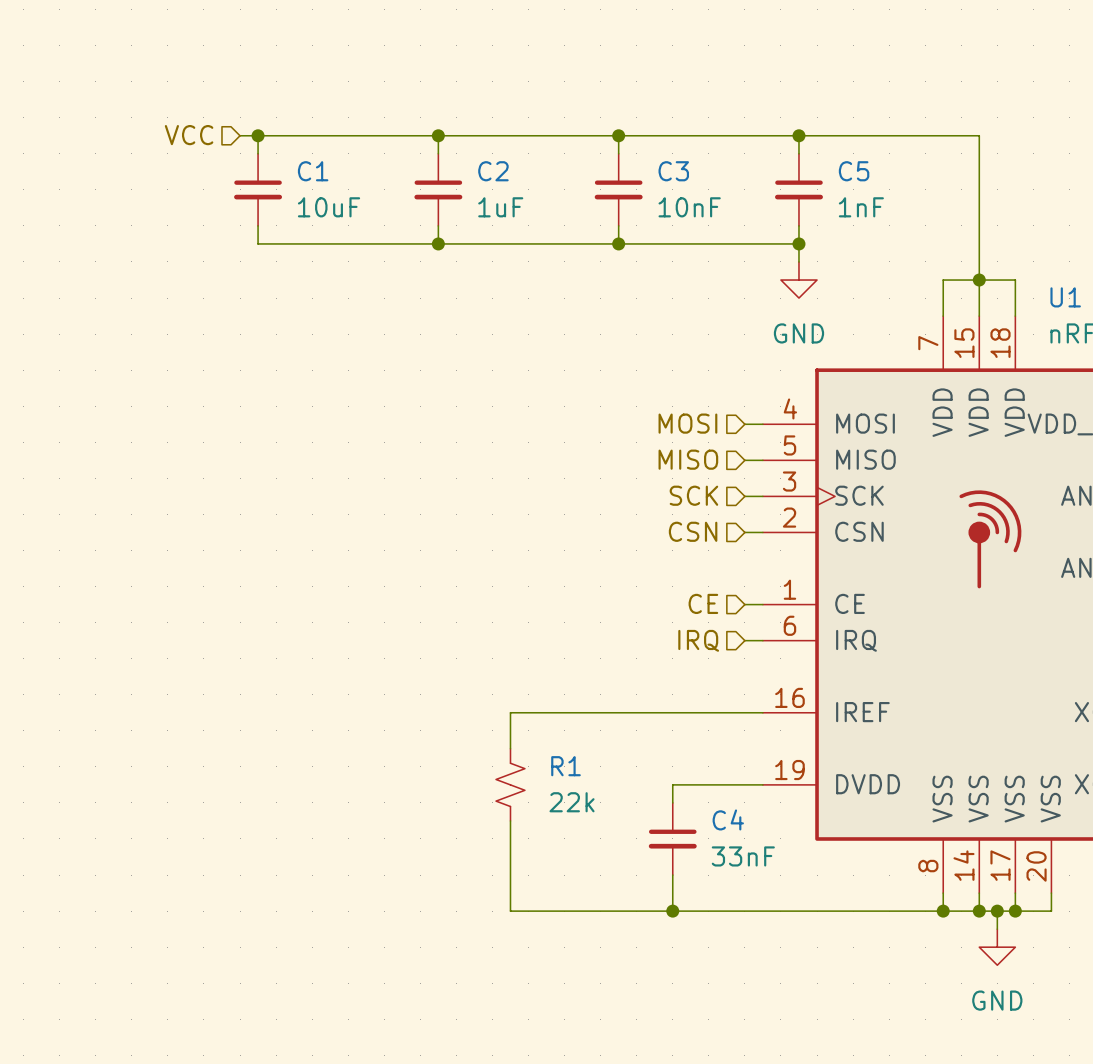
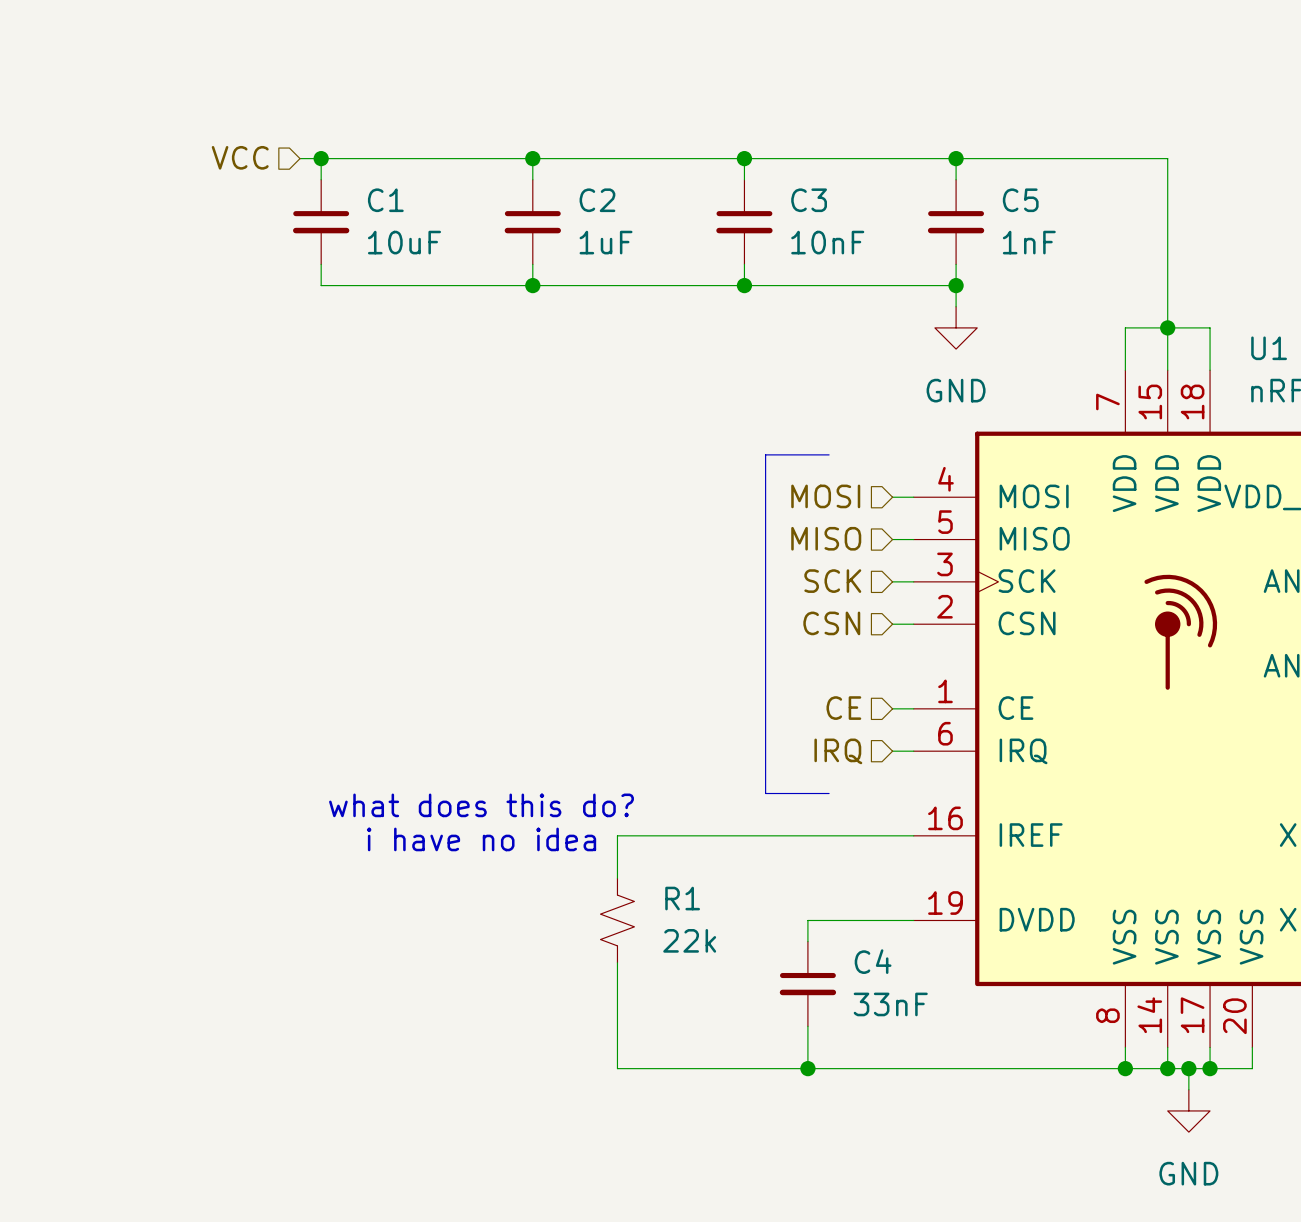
line: none -> (829, 454) (765, 454) (765, 793) (829, 793)
text: none -> what does this do? (481, 805)
text: none -> i have no idea (481, 839)

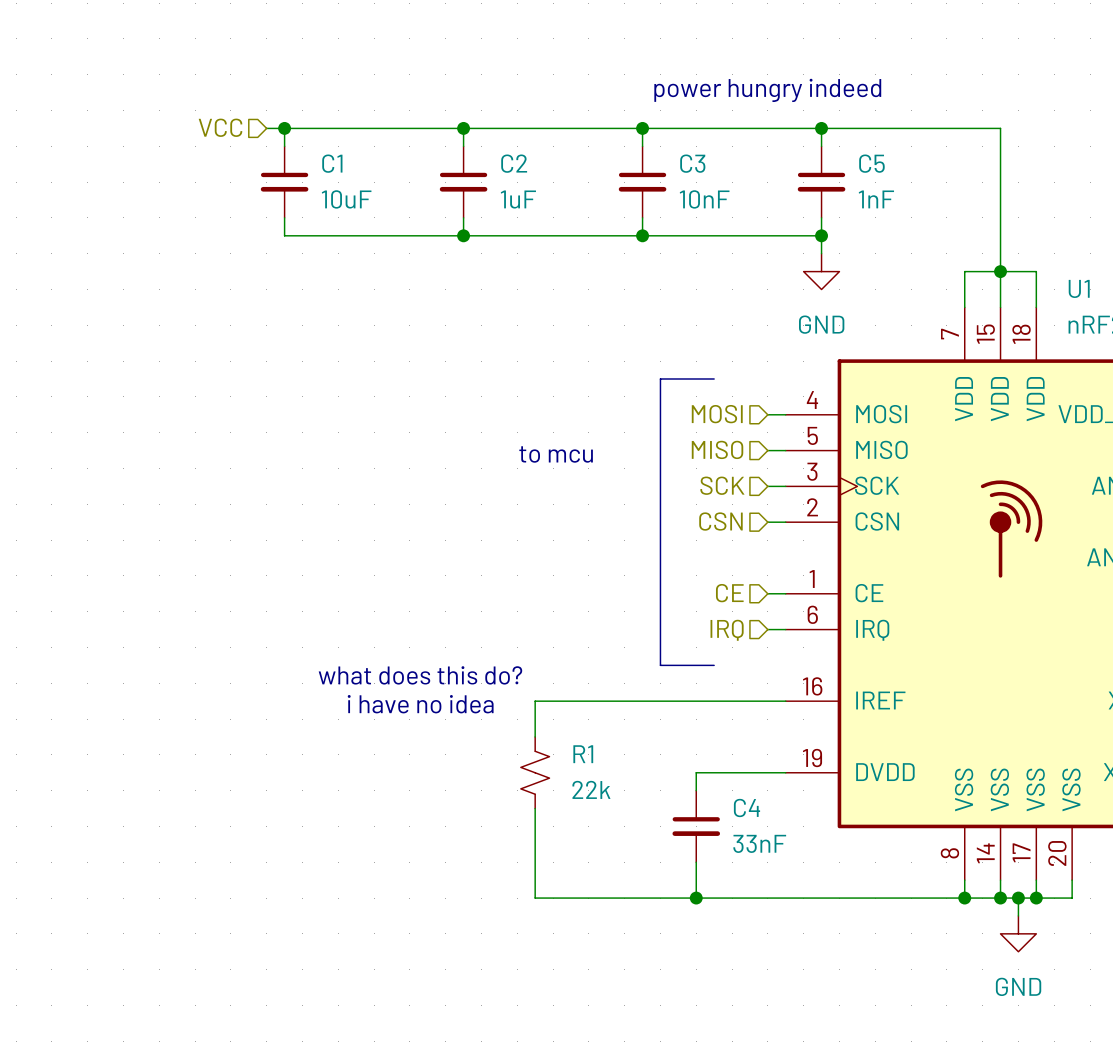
text: none -> power hungry indeed (767, 90)
text: none -> to mcu (556, 454)

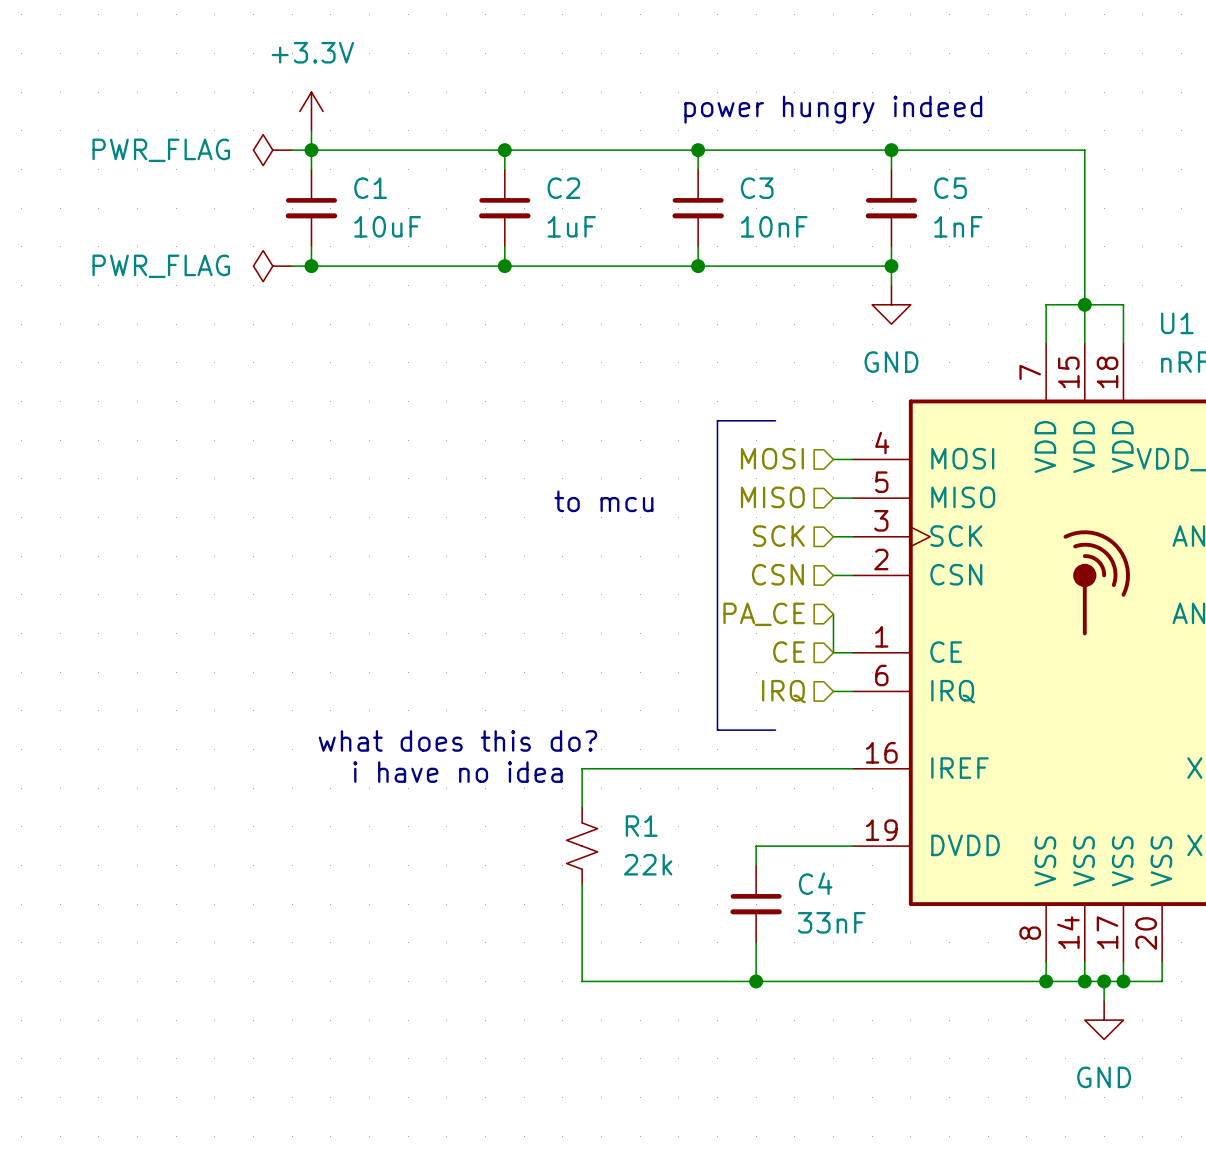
power symbol: none -> +3.3V (311, 111)
wire: none -> (311, 130) (311, 150)
hierarchical label: VCC (220, 127) -> none
power symbol: none -> PWR_FLAG (272, 150)
power symbol: none -> PWR_FLAG (272, 266)
wire: none -> (292, 266) (311, 266)
junction: none -> (311, 266)
hierarchical label: none -> PA_CE (764, 614)
wire: none -> (833, 614) (833, 652)

